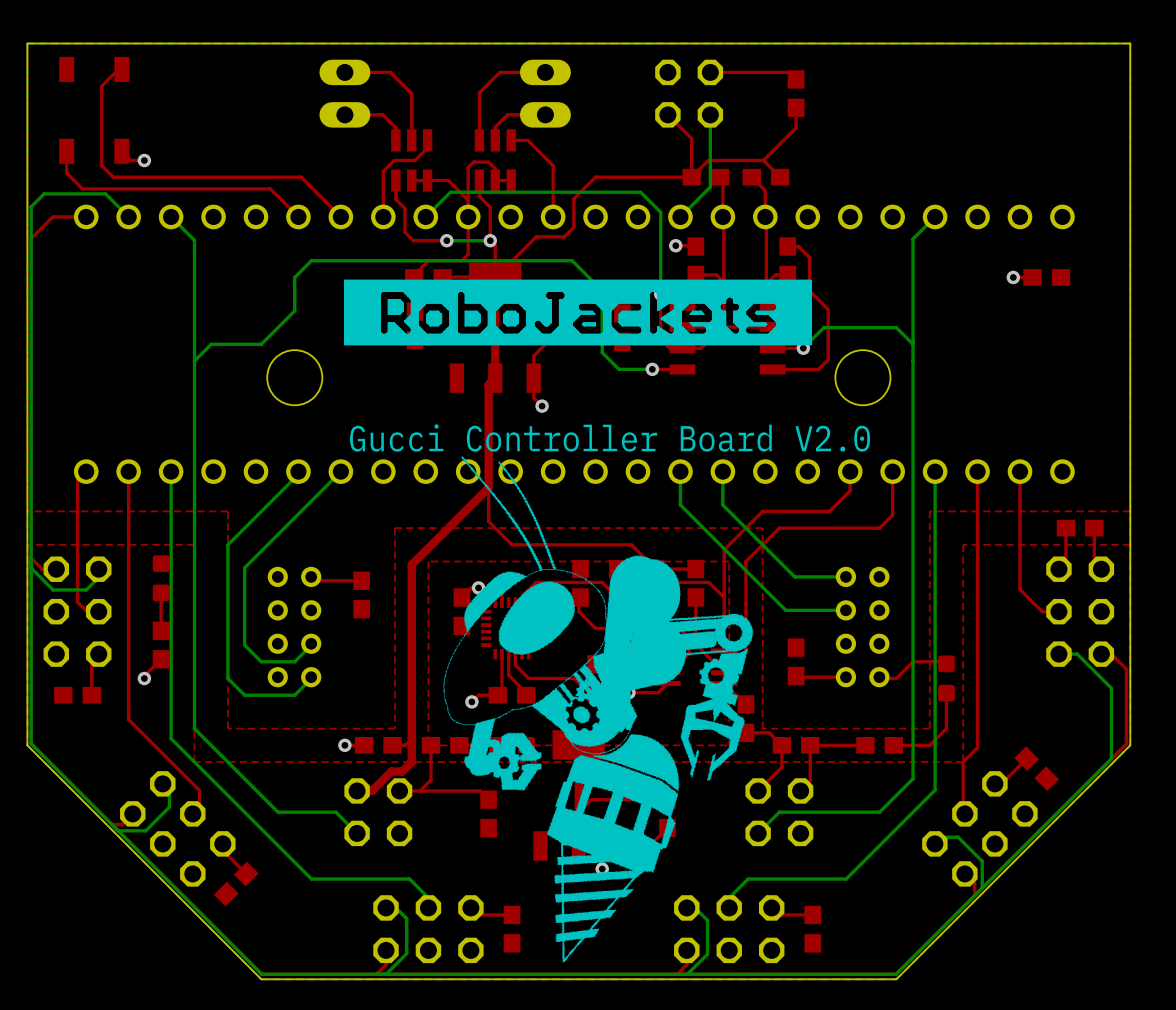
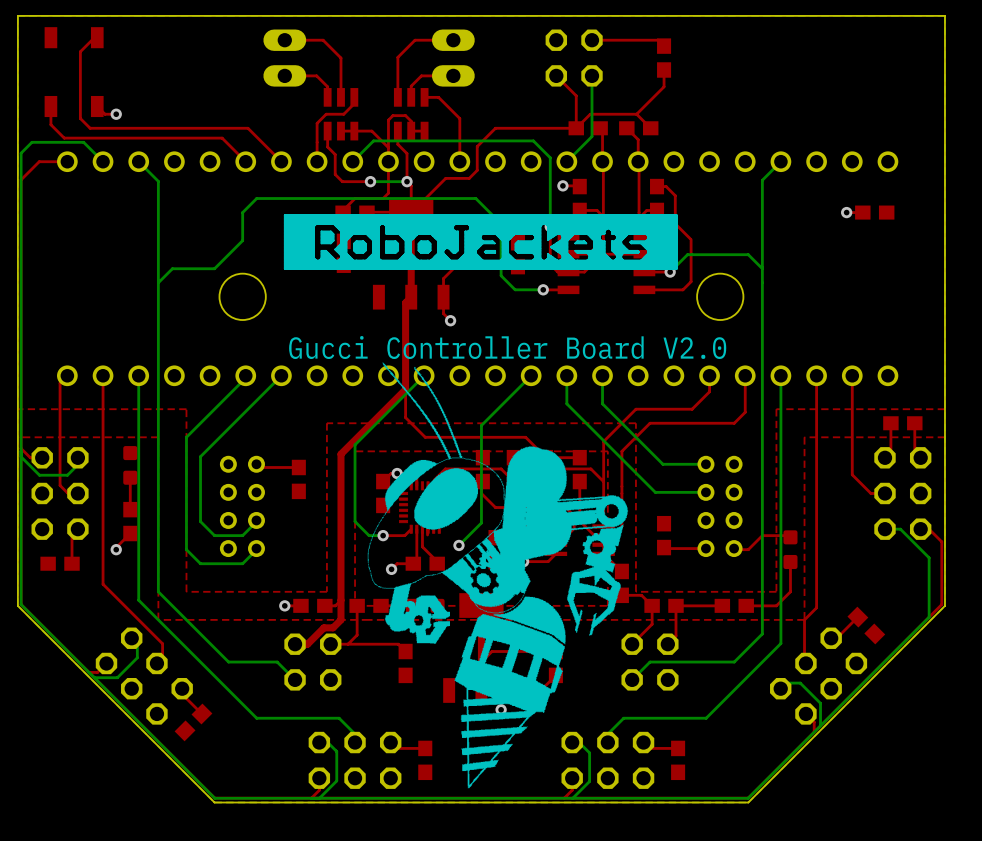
bottom track: none -> (424, 375) (355, 444) (355, 521) (369, 535) (383, 535)
bottom track: none -> (531, 375) (481, 425) (481, 522) (458, 545)
top track: none -> (411, 529) (404, 535) (383, 535)
top track: (515, 654) (515, 665) (528, 678) (574, 678) (588, 692) (595, 692) -> (428, 529) (427, 534)
via: none -> (383, 535)
via: none -> (458, 545)

